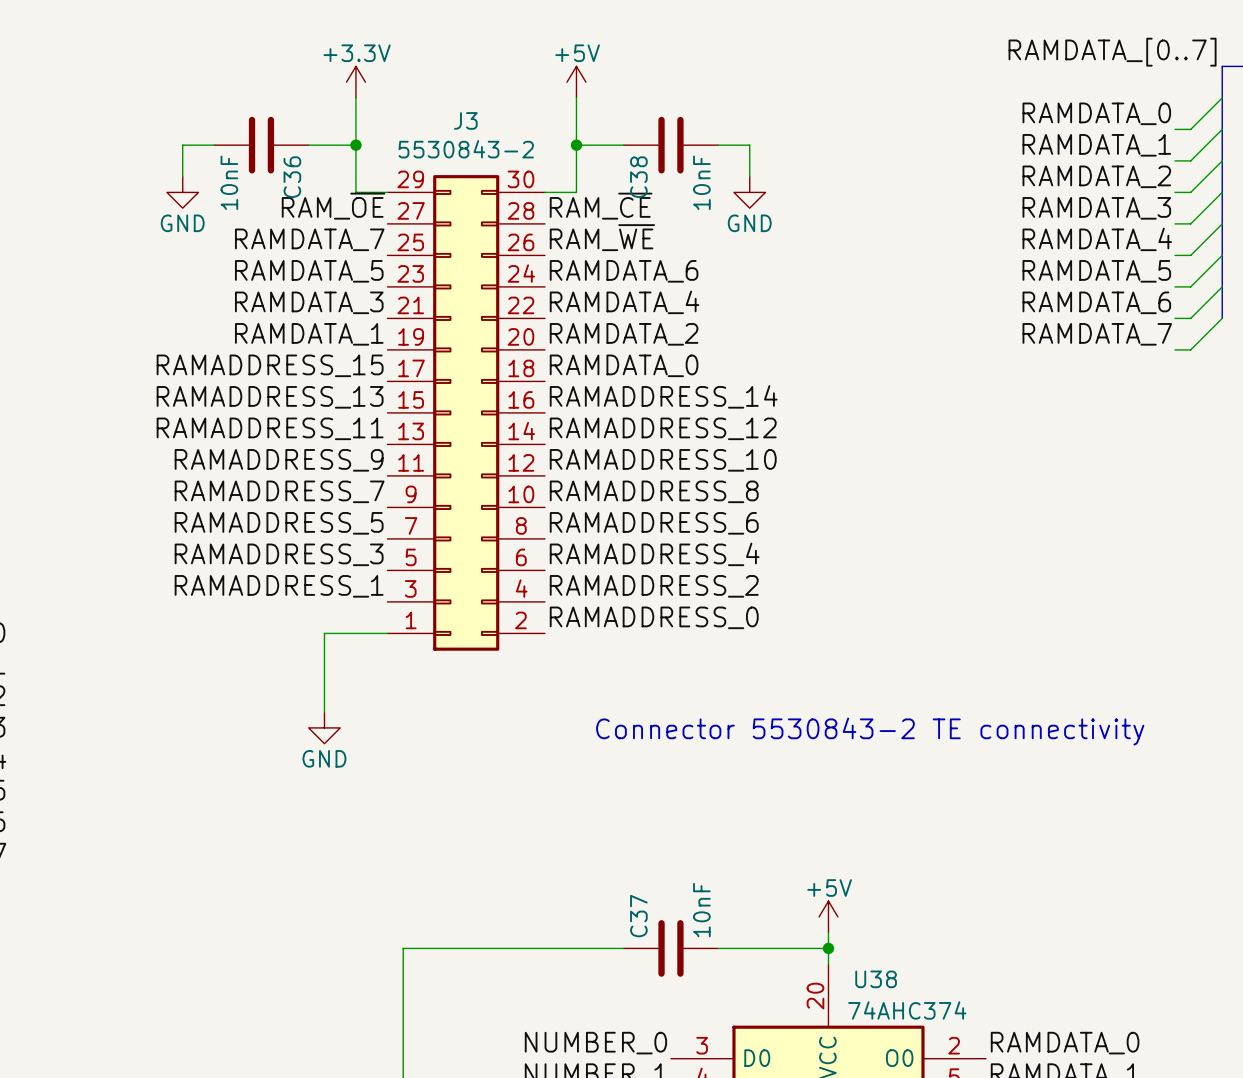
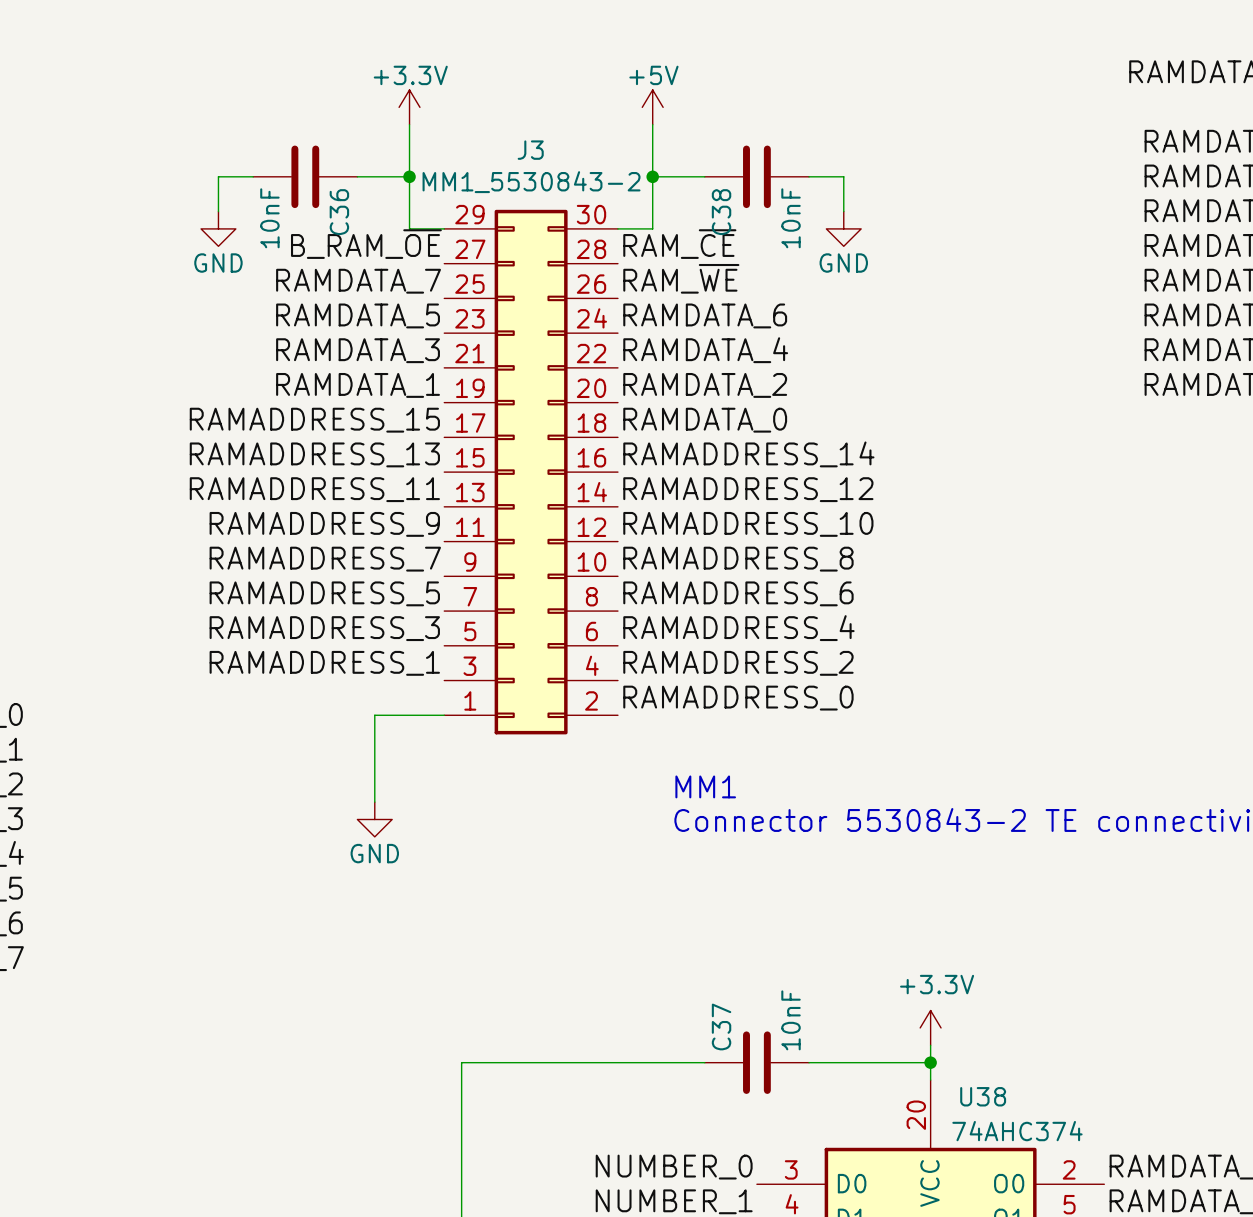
J3 value: 5530843-2 (466, 149) -> MM1_5530843-2 (531, 182)
label: RAM_~{OE} (333, 206) -> B_RAM_~{OE} (366, 244)
text: none -> MM1 (705, 786)
power symbol: +5V (828, 916) -> +3.3V (930, 1027)

